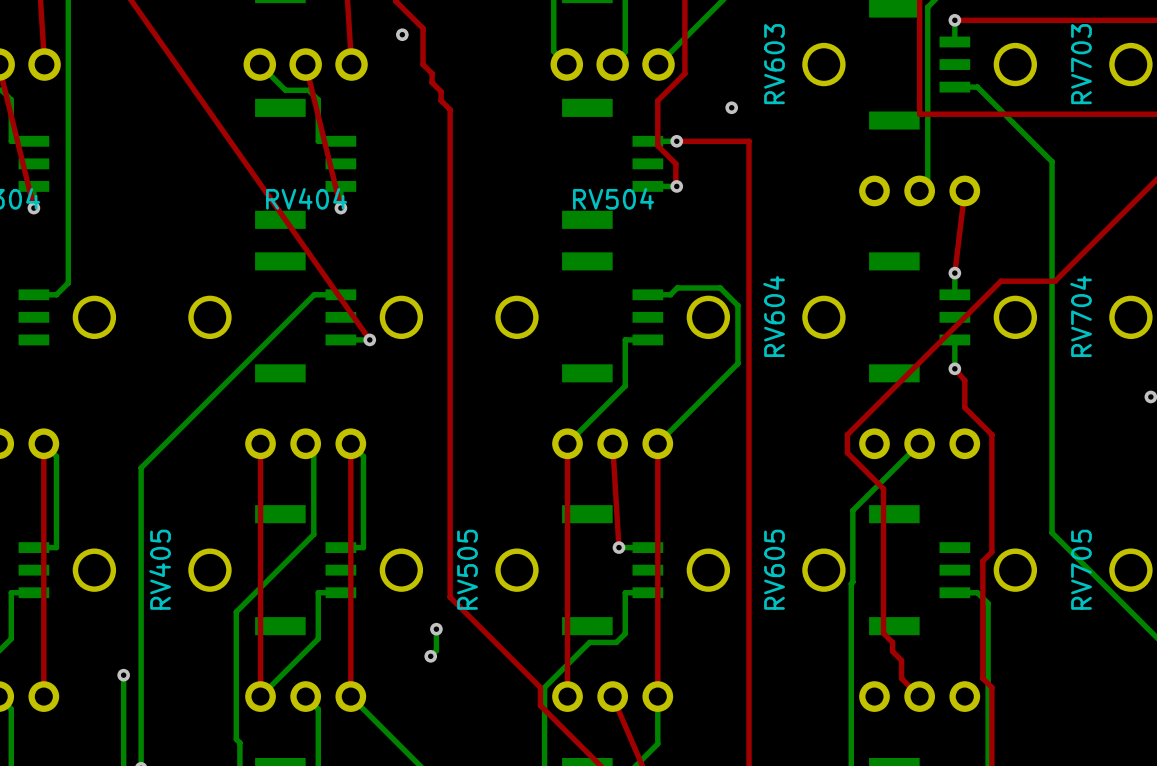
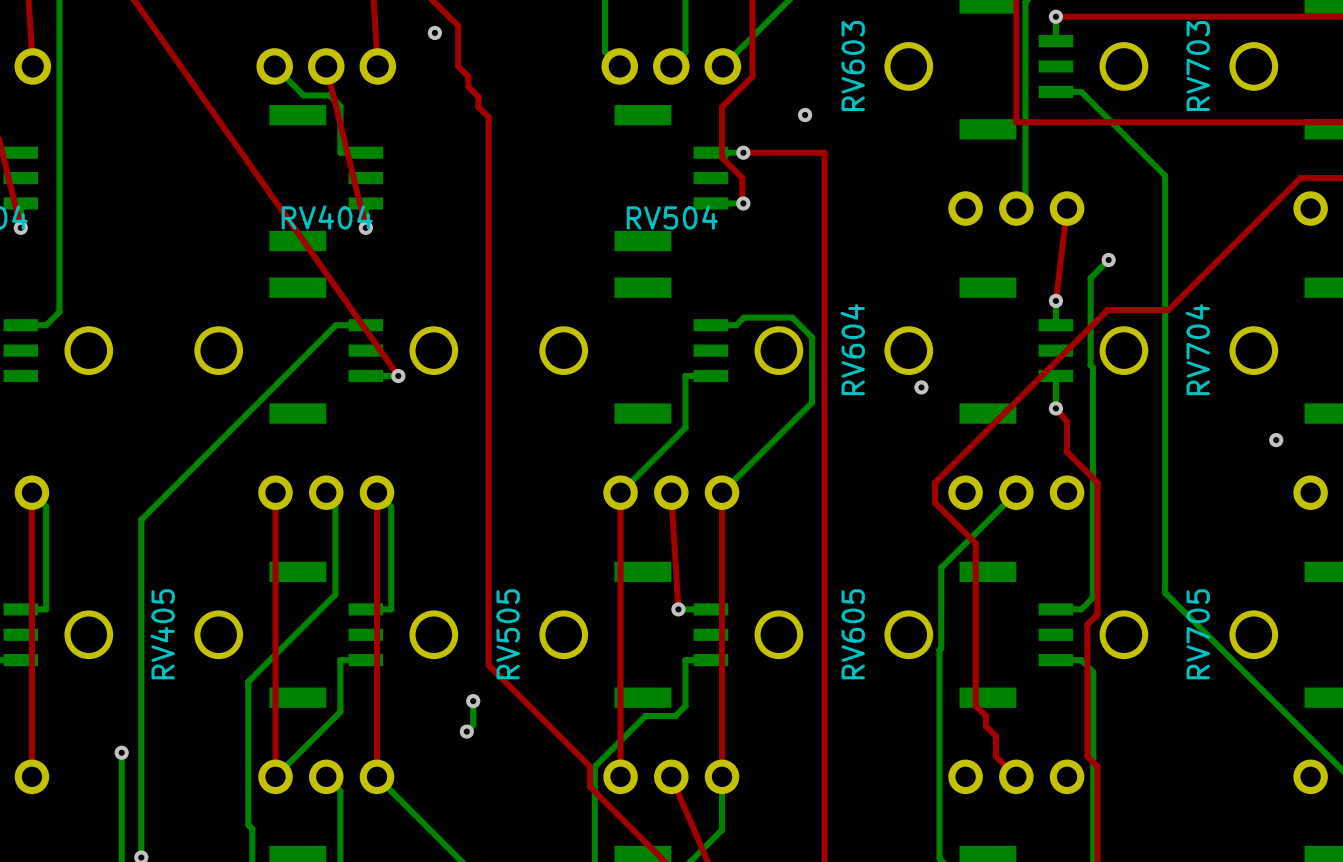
bottom track: none -> (1108, 260) (1090, 278) (1090, 365) (1092, 367) (1092, 597) (1081, 609) (1055, 609)
via: none -> (1108, 260)
via: none -> (921, 387)

